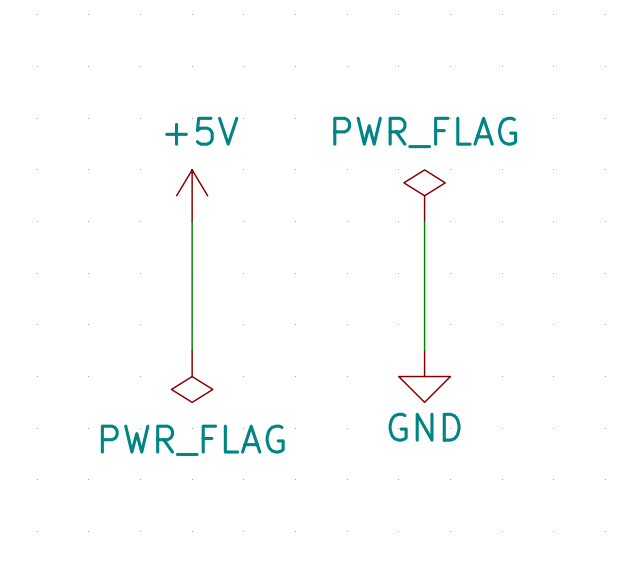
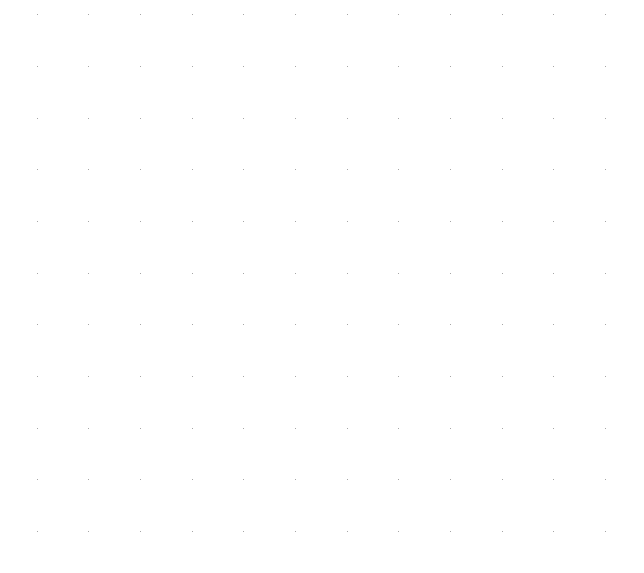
power symbol: +5V (192, 195) -> none
power symbol: PWR_FLAG (424, 195) -> none
wire: (192, 221) (192, 350) -> none
wire: (424, 221) (424, 350) -> none
power symbol: PWR_FLAG (192, 376) -> none
power symbol: GND (424, 376) -> none

